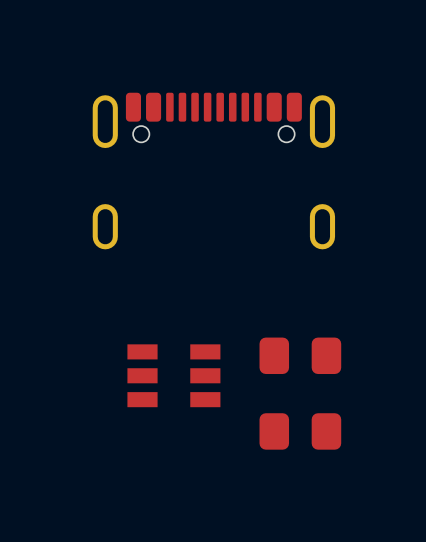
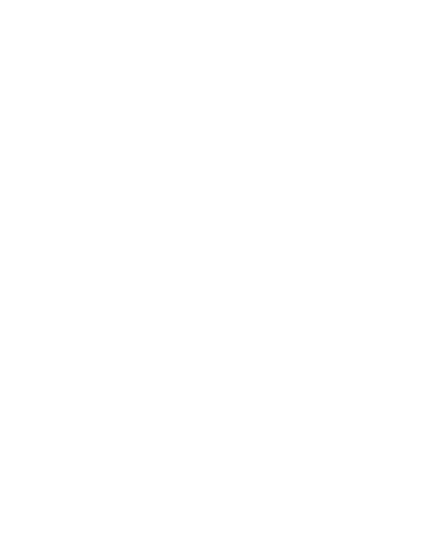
part: (213, 171) -> none
part: (300, 355) -> none
part: (173, 375) -> none
part: (300, 431) -> none

